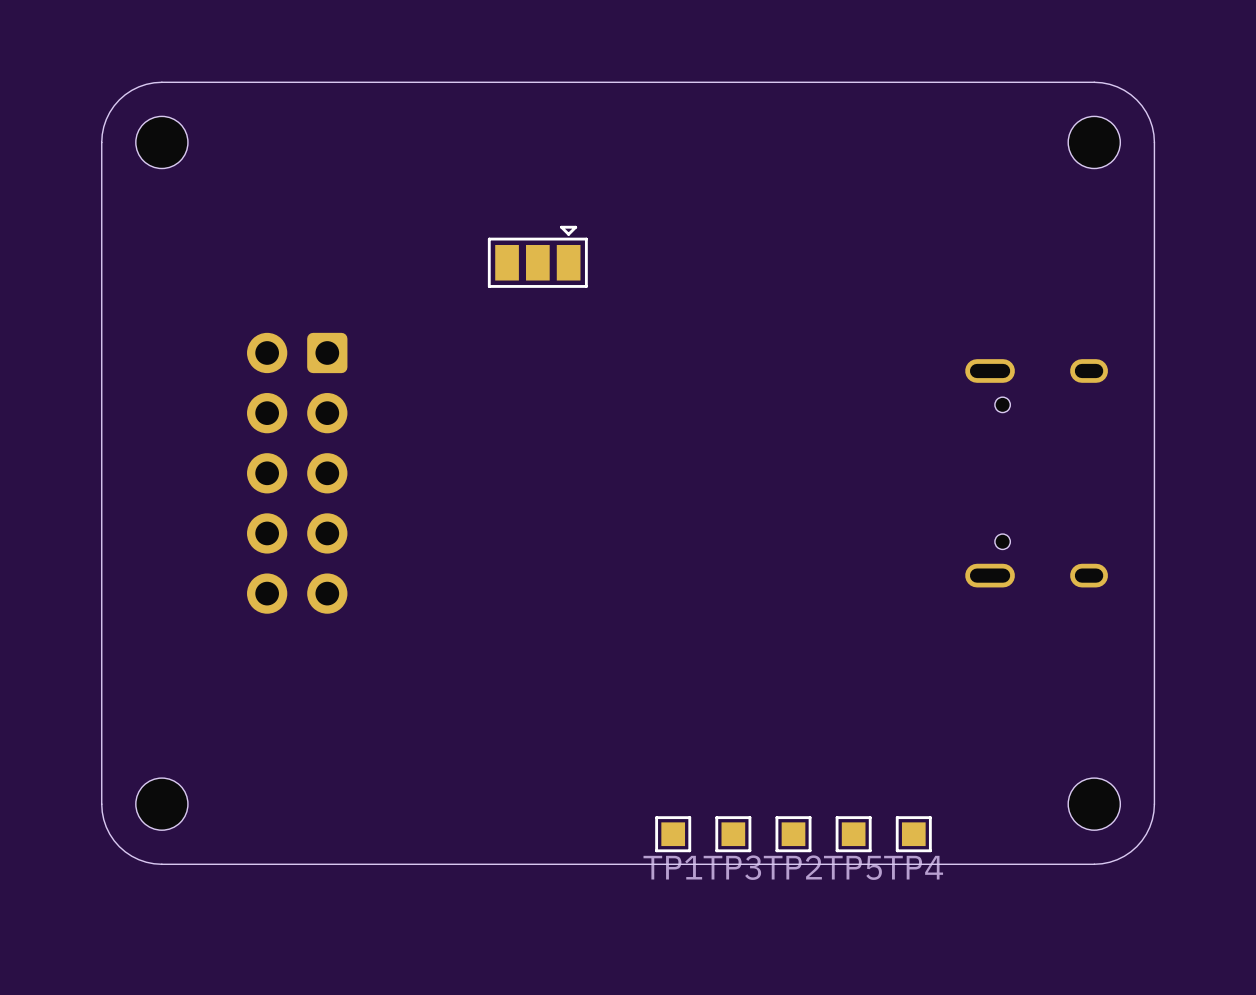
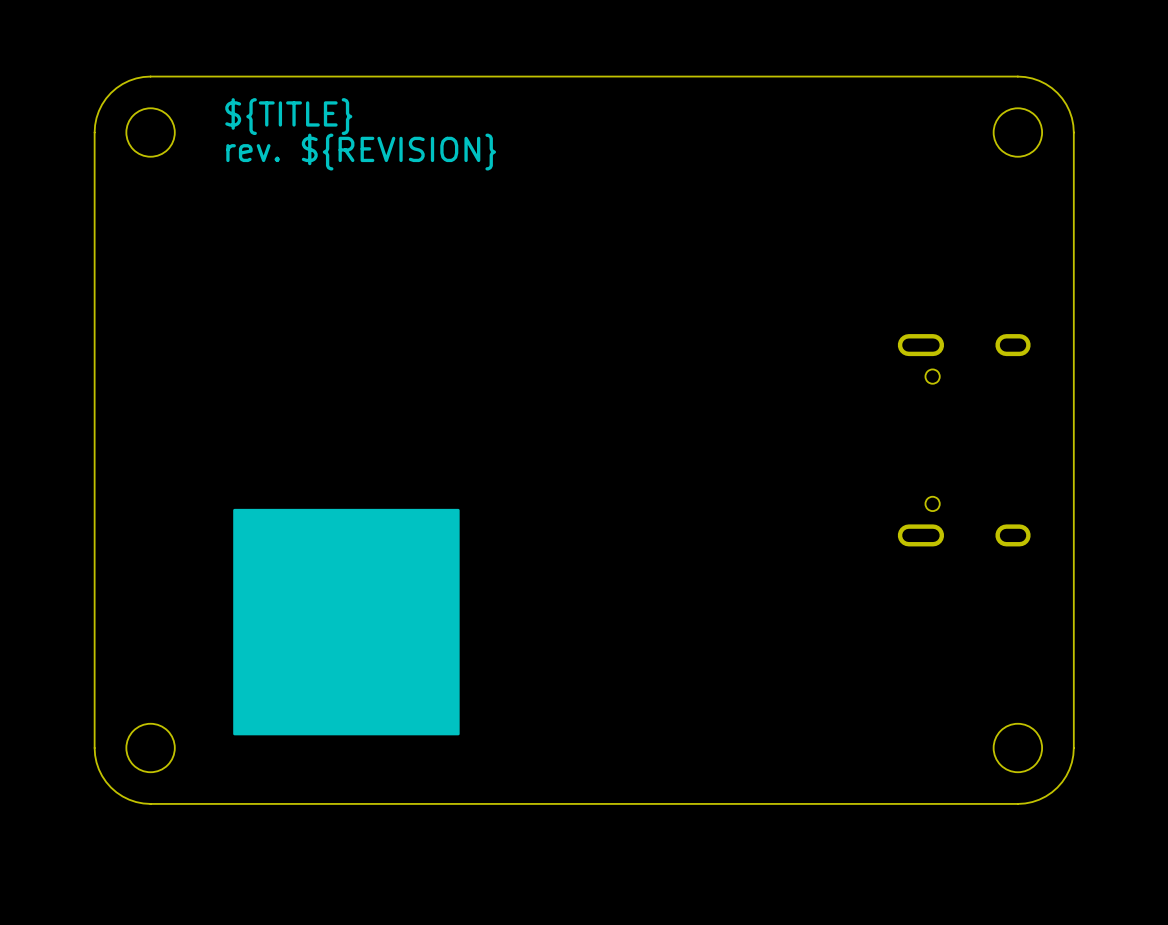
text: none -> ${TITLE} (288, 116)
text: none -> rev. ${REVISION} (361, 152)
part: (537, 256) -> none
part: (297, 473) -> none
drawing: none -> [233, 508, 460, 736]
TP1: (673, 834) -> none
TP3: (733, 834) -> none
TP2: (793, 834) -> none
TP5: (853, 834) -> none
TP4: (913, 834) -> none

